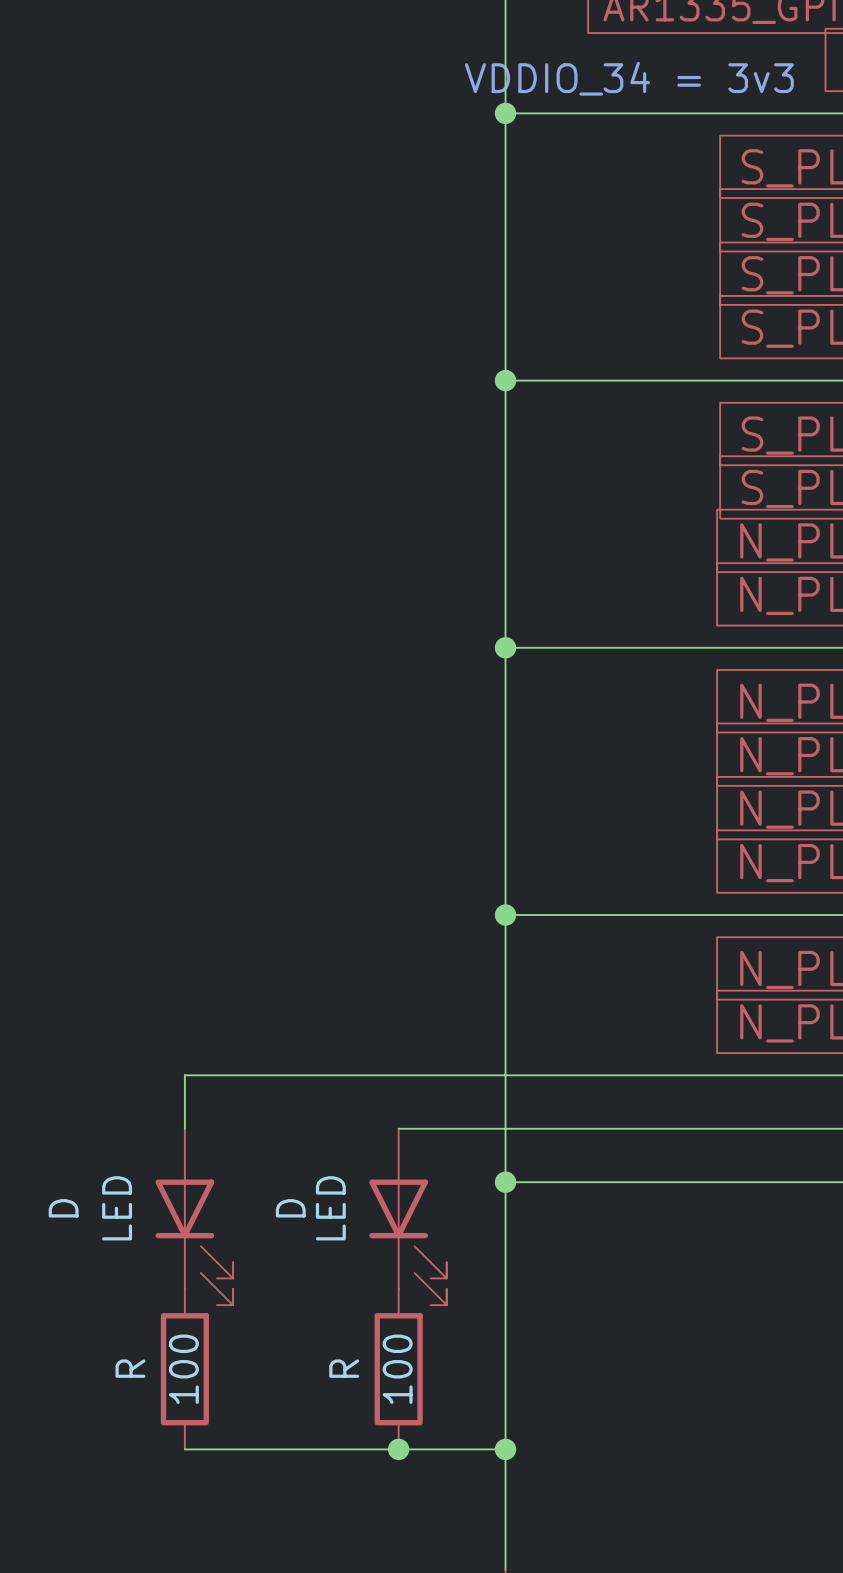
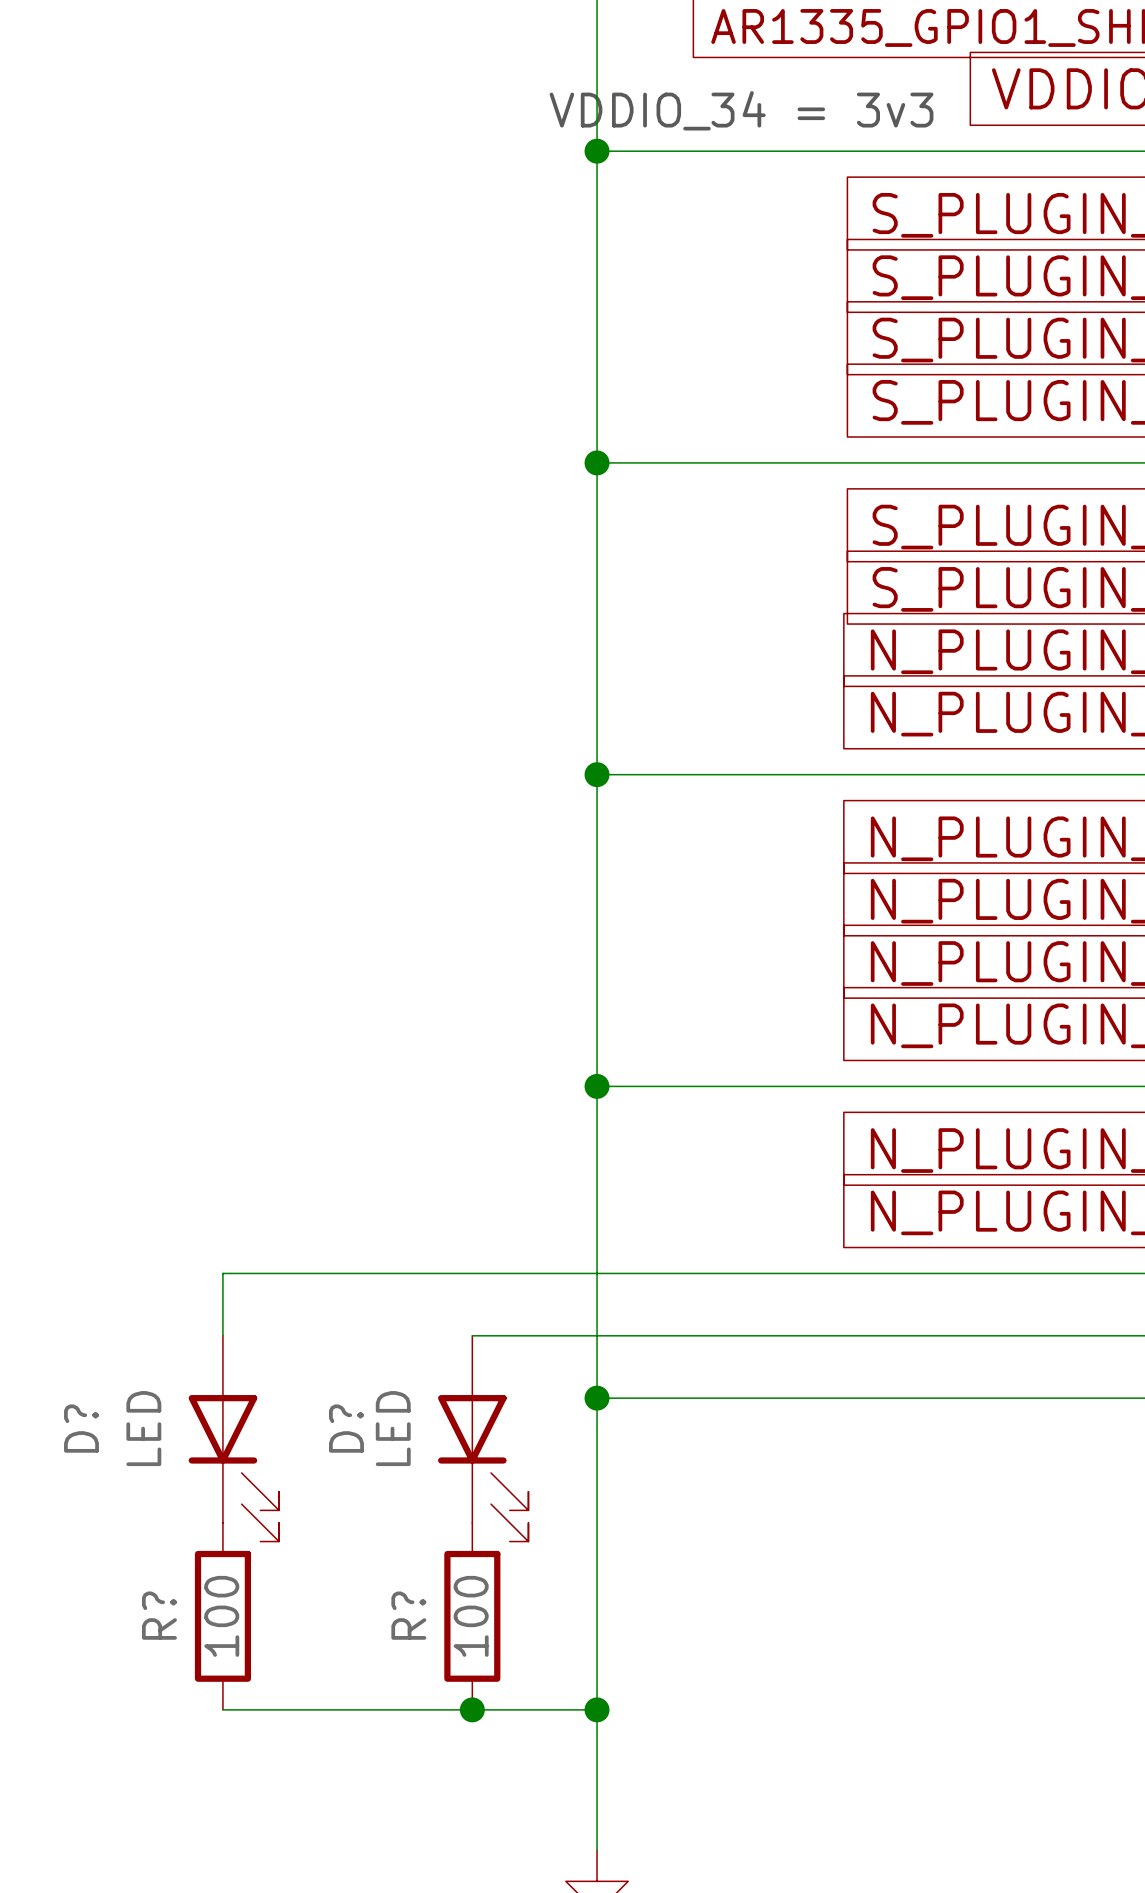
D name: D (63, 1208) -> D? (81, 1428)
D name: D (290, 1208) -> D? (346, 1428)
R name: R (130, 1368) -> R? (159, 1615)
R name: R (344, 1368) -> R? (408, 1615)

